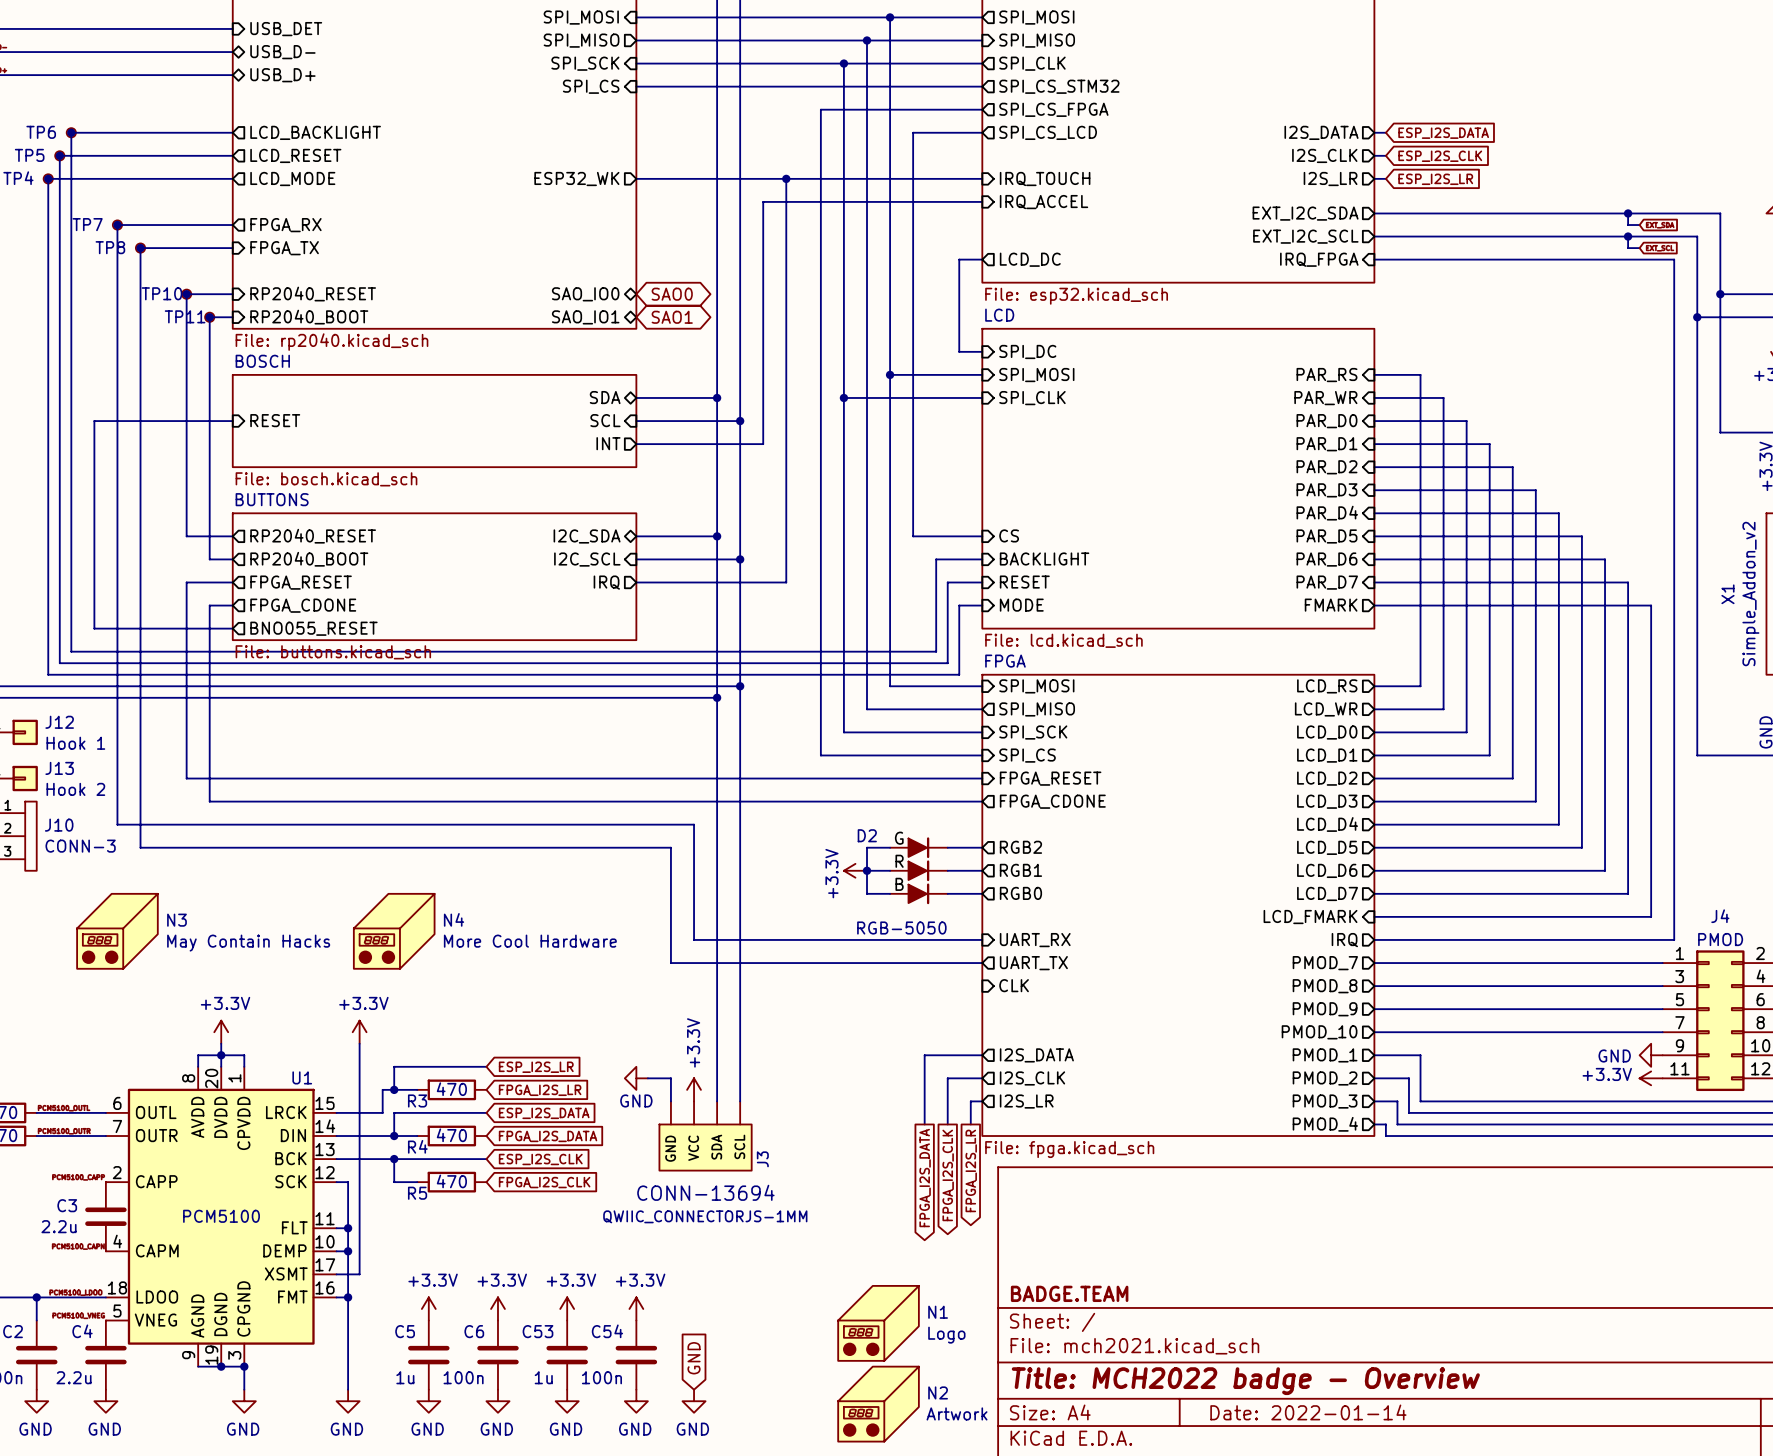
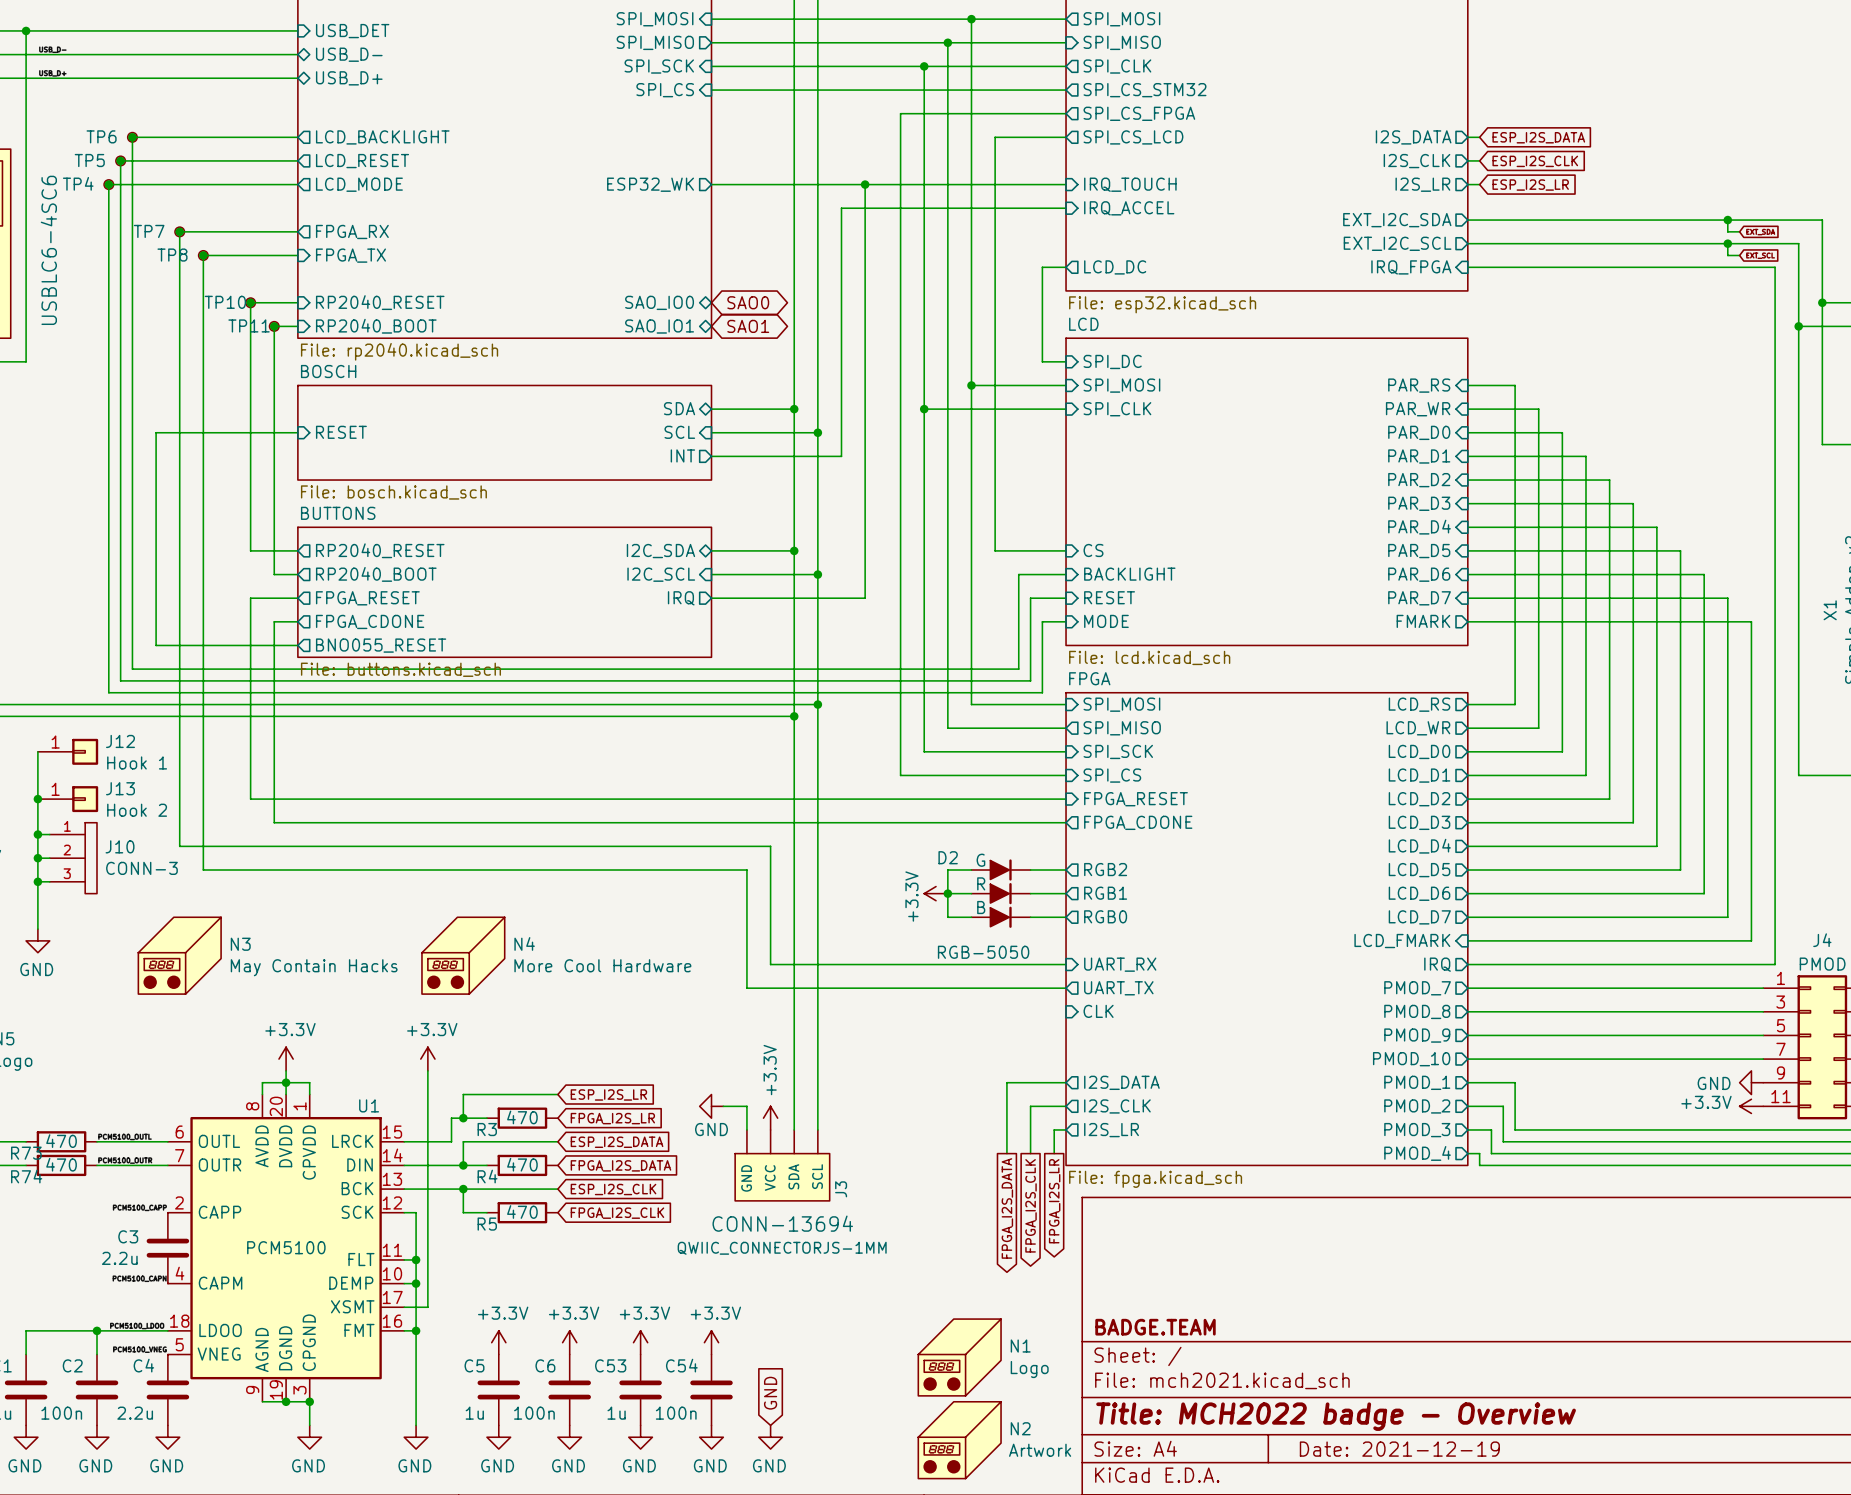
title block: Date: 2022-01-14 (1308, 1412) -> Date: 2021-12-19 (1399, 1449)

